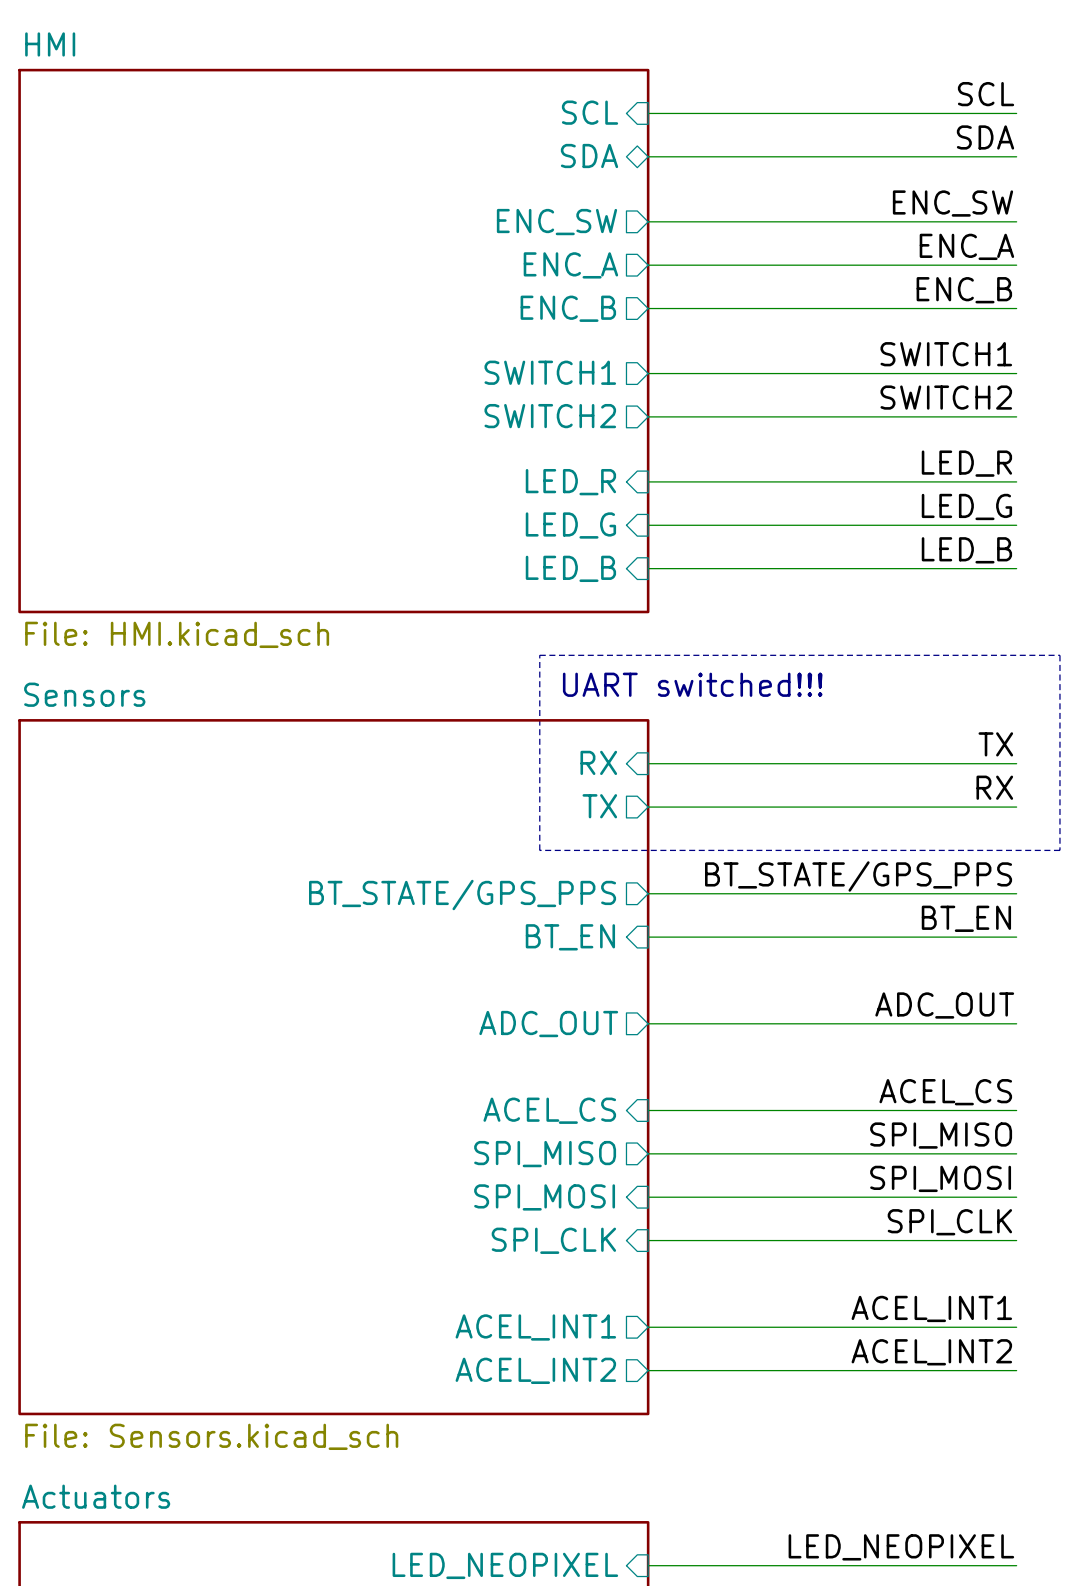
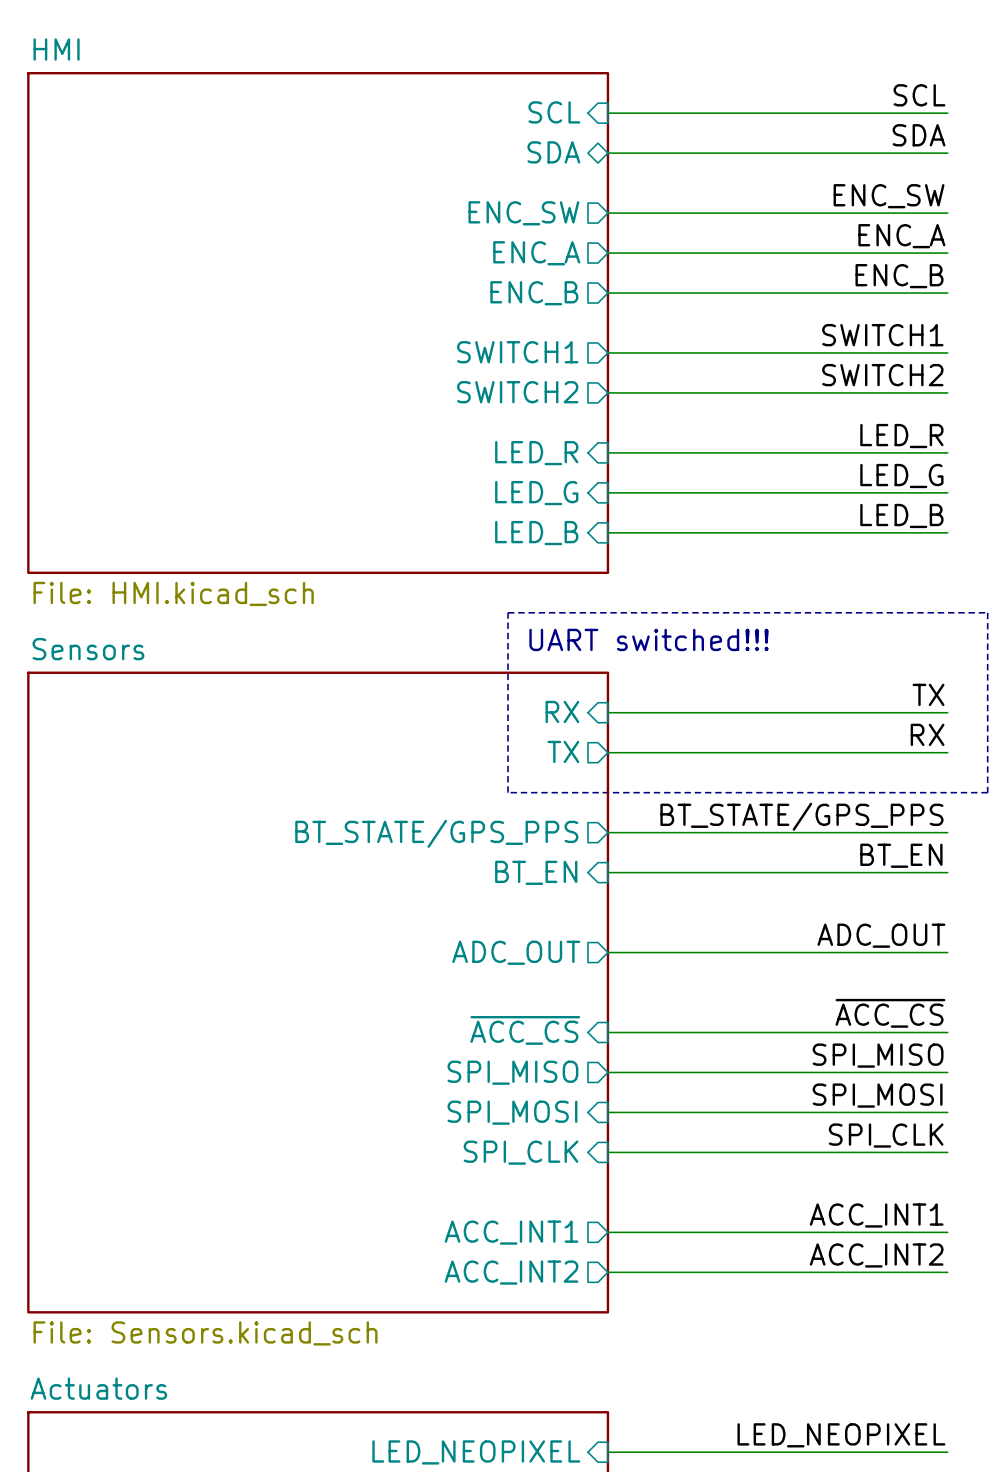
label: ACEL_CS (945, 1092) -> ~{ACC_CS} (890, 1013)
sheet pin: ACEL_CS (549, 1110) -> ~{ACC_CS} (525, 1030)
label: ACEL_INT1 (931, 1308) -> ACC_INT1 (876, 1215)
sheet pin: ACEL_INT1 (535, 1327) -> ACC_INT1 (511, 1232)
label: ACEL_INT2 (931, 1352) -> ACC_INT2 (876, 1255)
sheet pin: ACEL_INT2 (535, 1370) -> ACC_INT2 (511, 1272)

